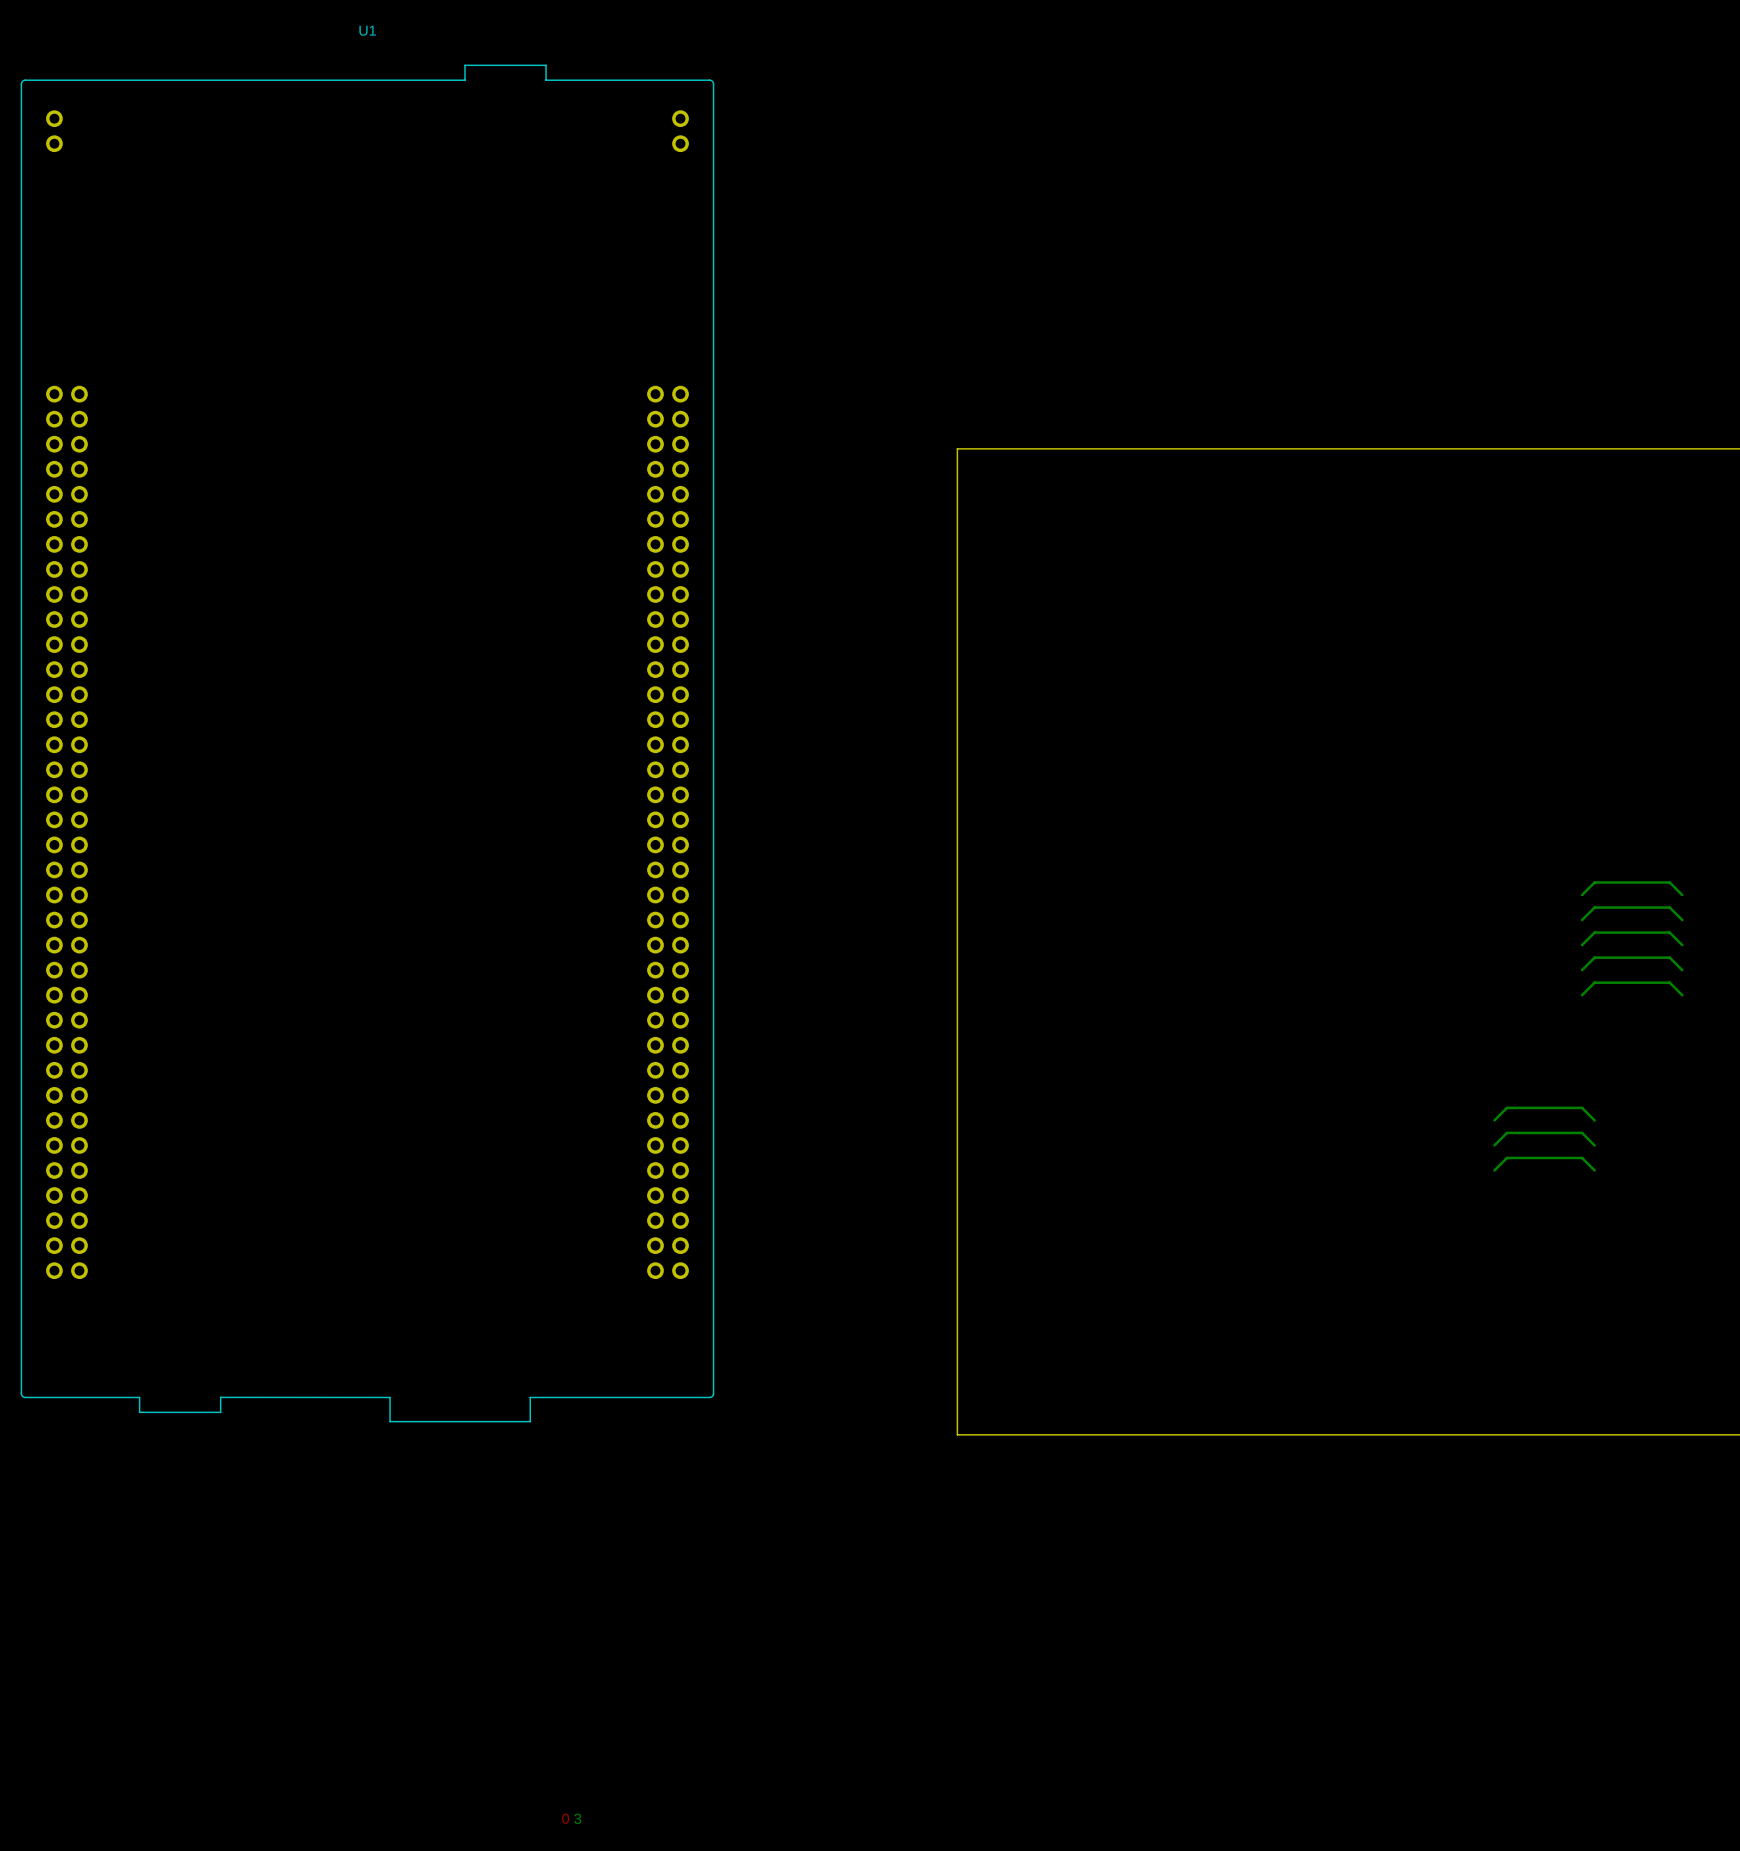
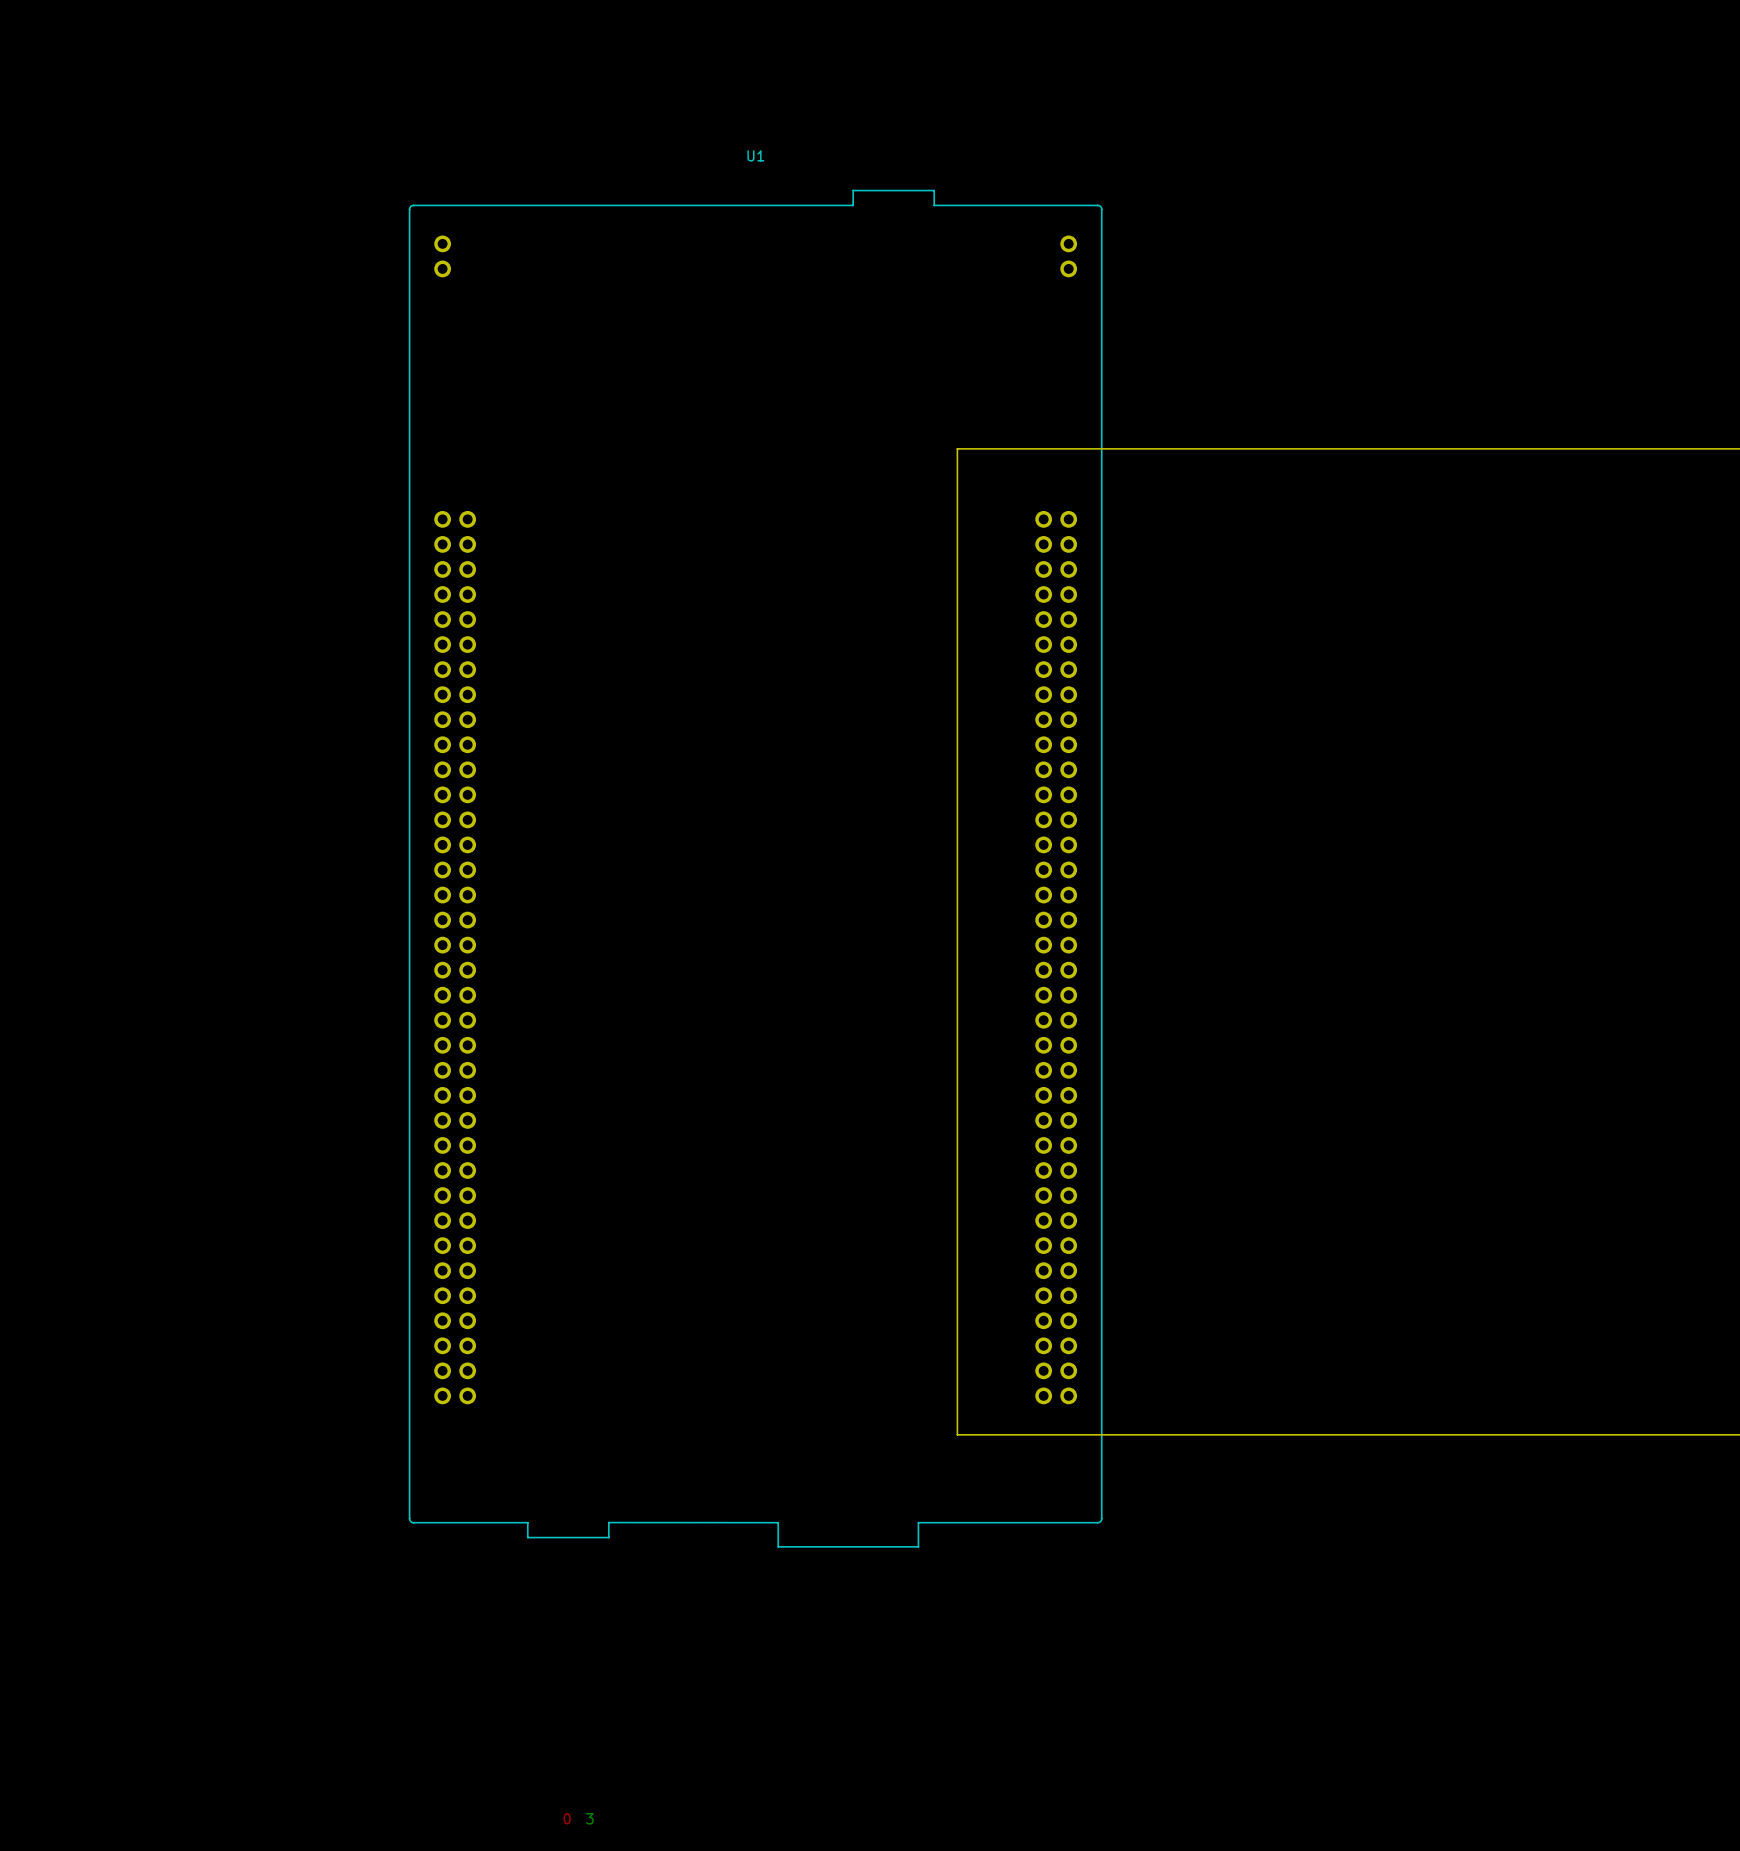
U1 position: (367, 743) -> (755, 868)
bottom track: (1582, 895) (1594, 882) (1669, 882) (1682, 895) -> none
bottom track: (1582, 920) (1594, 907) (1669, 907) (1682, 920) -> none
bottom track: (1582, 945) (1594, 932) (1669, 932) (1682, 945) -> none
bottom track: (1582, 970) (1594, 957) (1669, 957) (1682, 970) -> none
bottom track: (1582, 995) (1594, 982) (1669, 982) (1682, 995) -> none
bottom track: (1494, 1120) (1506, 1107) (1582, 1107) (1594, 1120) -> none
bottom track: (1494, 1145) (1506, 1132) (1582, 1132) (1594, 1145) -> none
bottom track: (1494, 1170) (1506, 1157) (1582, 1157) (1594, 1170) -> none

